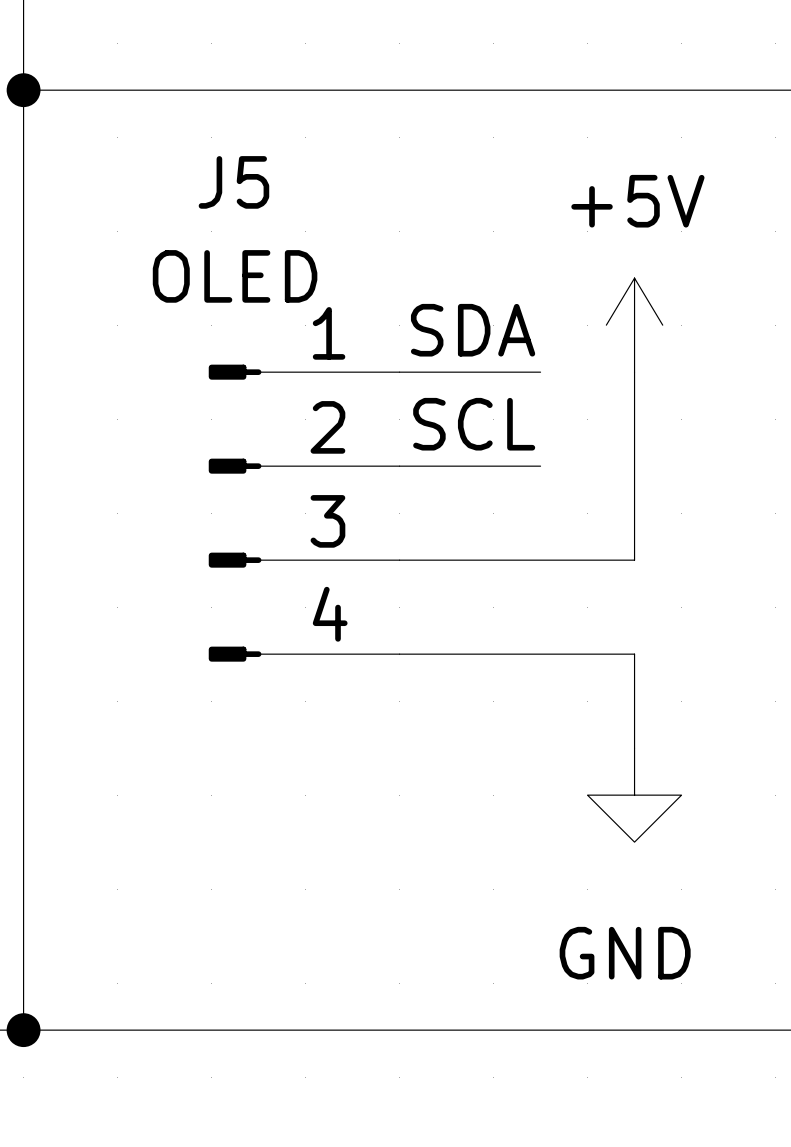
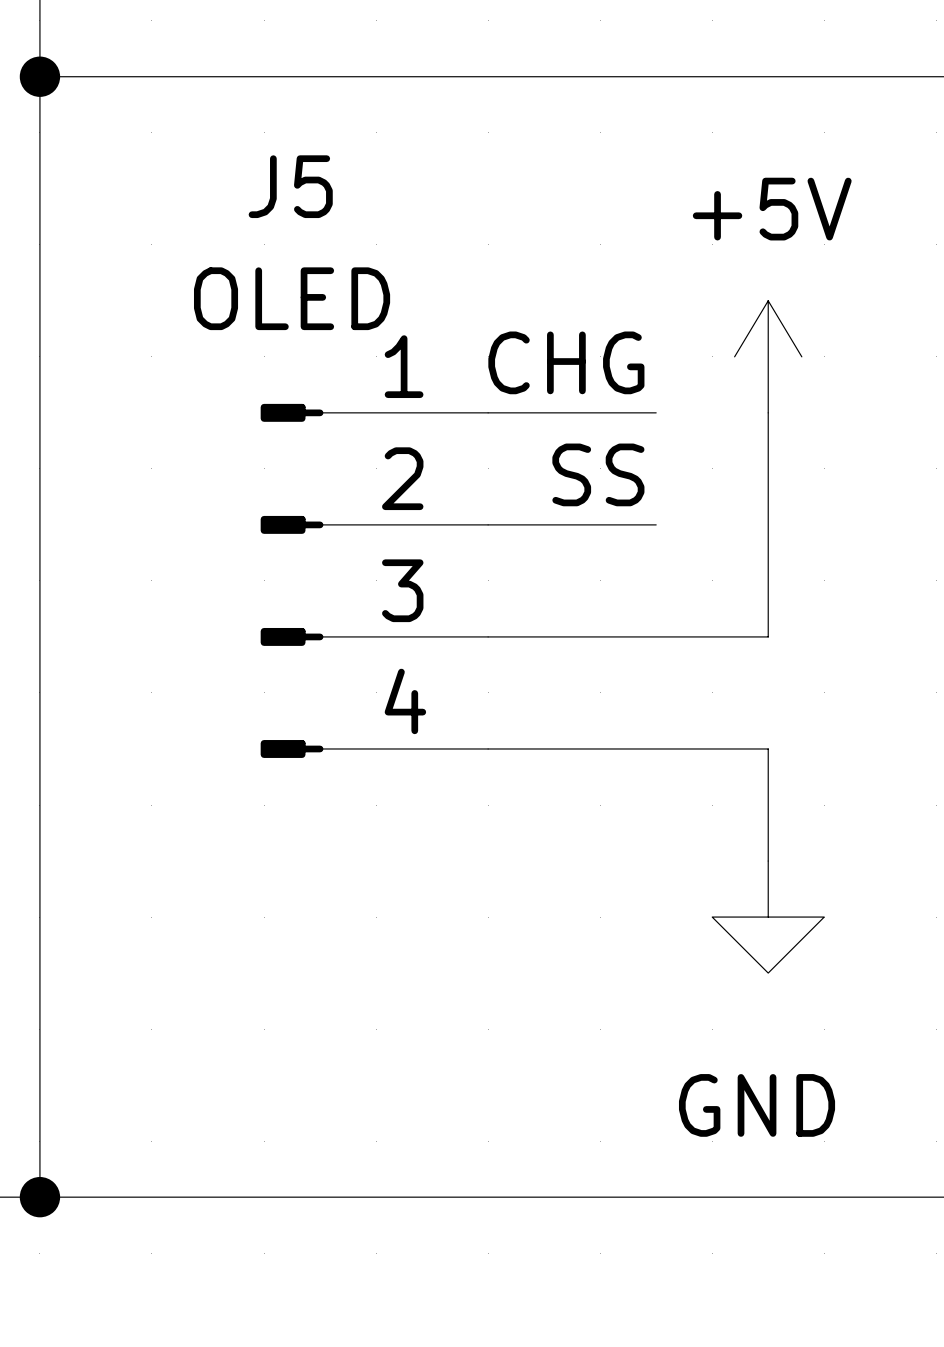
label: SDA (473, 330) -> CHG (566, 362)
label: SCL (474, 424) -> SS (598, 474)

